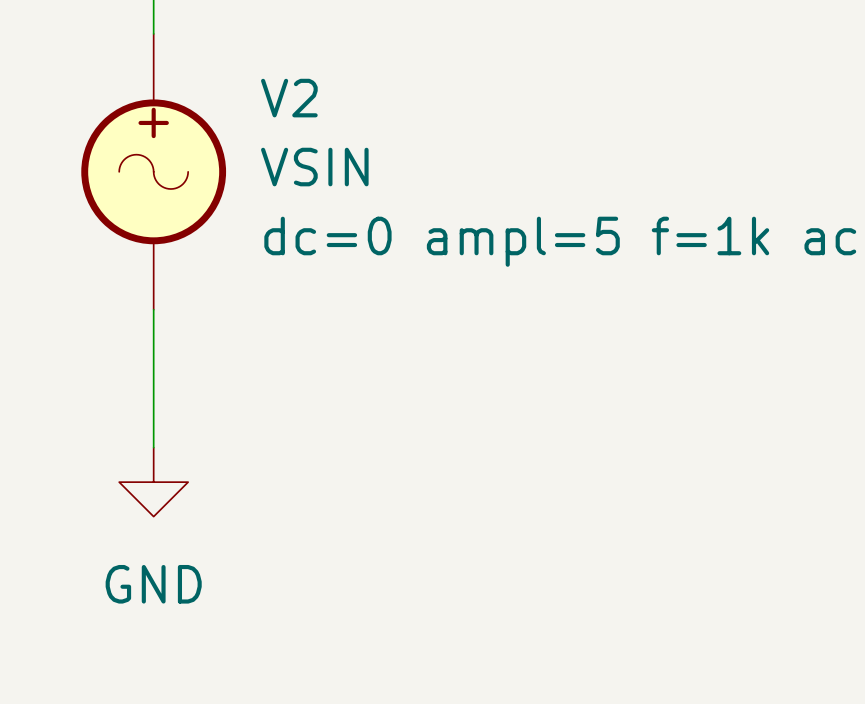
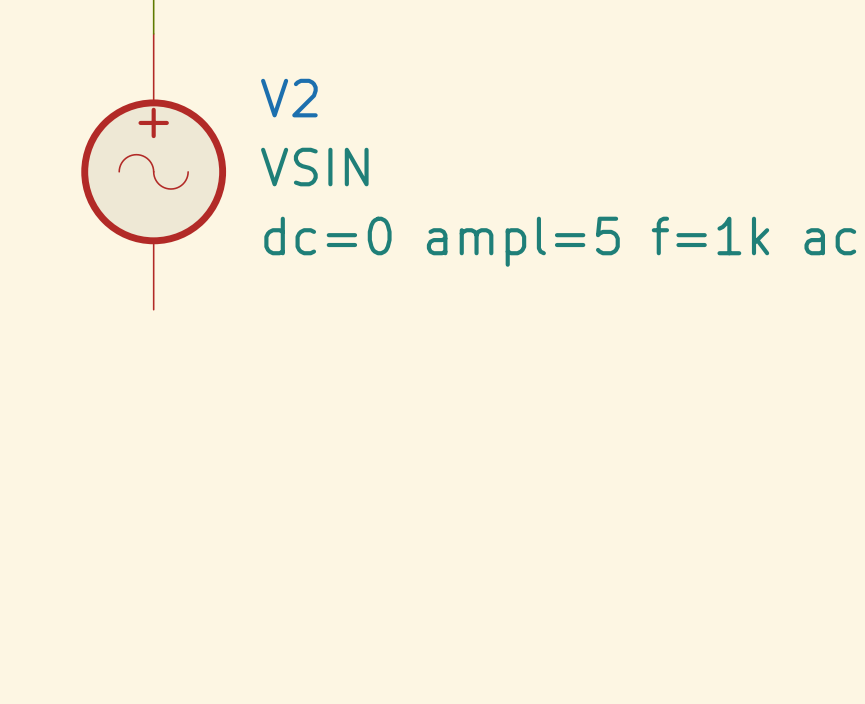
wire: (153, 309) (153, 447) -> none
power symbol: GND (153, 482) -> none

